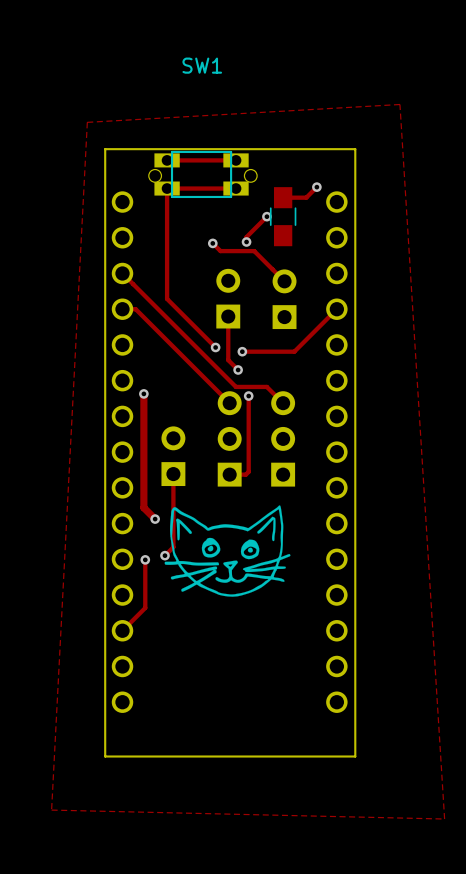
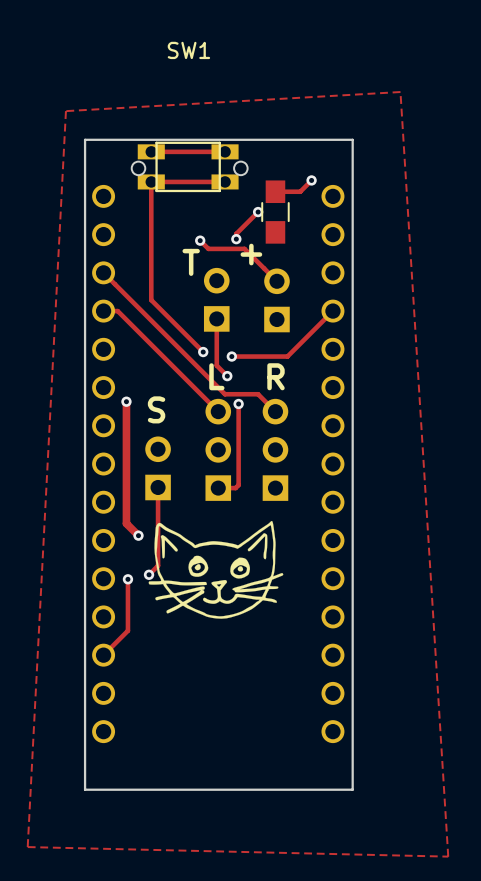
text: none -> + (251, 254)
text: none -> T (191, 262)
text: none -> L (216, 376)
text: none -> R (276, 376)
text: none -> S (156, 409)

